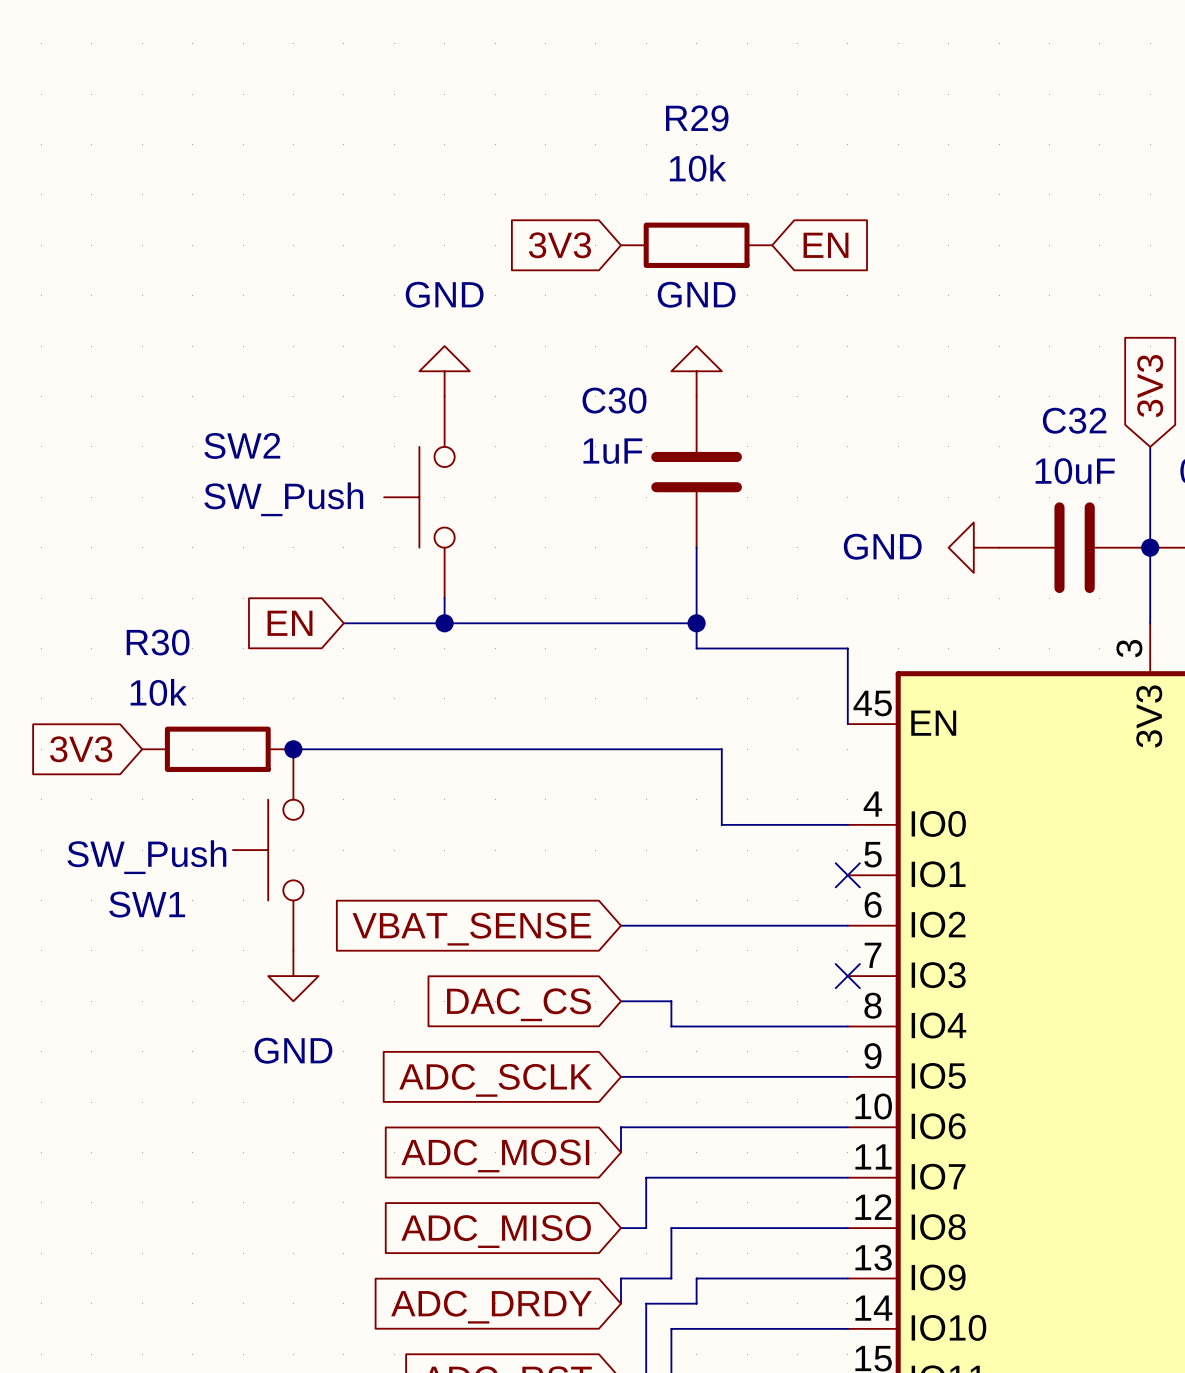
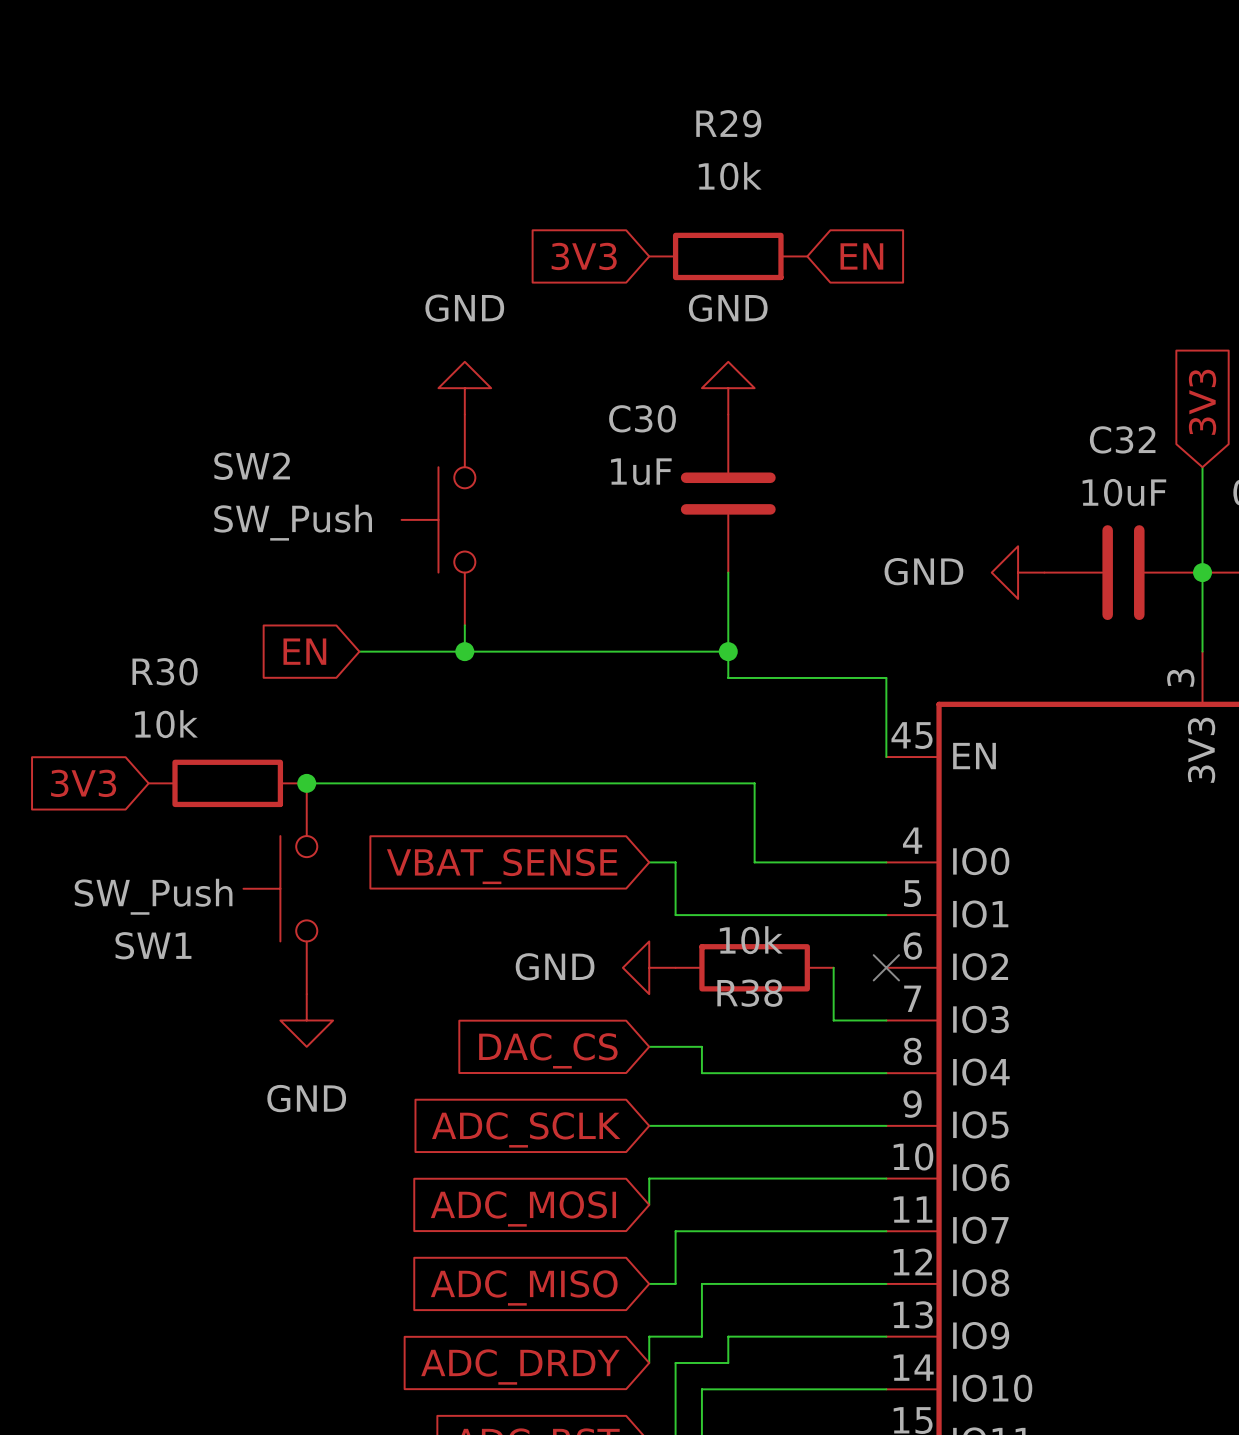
wire: none -> (649, 862) (675, 862) (675, 915) (886, 915)
no-connect mark: (847, 875) -> none
wire: (621, 925) (847, 925) -> none
power symbol: none -> GND (649, 967)
R38: none -> 10k (754, 967)
wire: none -> (833, 967) (833, 1020) (886, 1020)
no-connect mark: none -> (886, 967)
global label position: VBAT_SENSE (471, 929) -> VBAT_SENSE (502, 866)
no-connect mark: (847, 976) -> none

